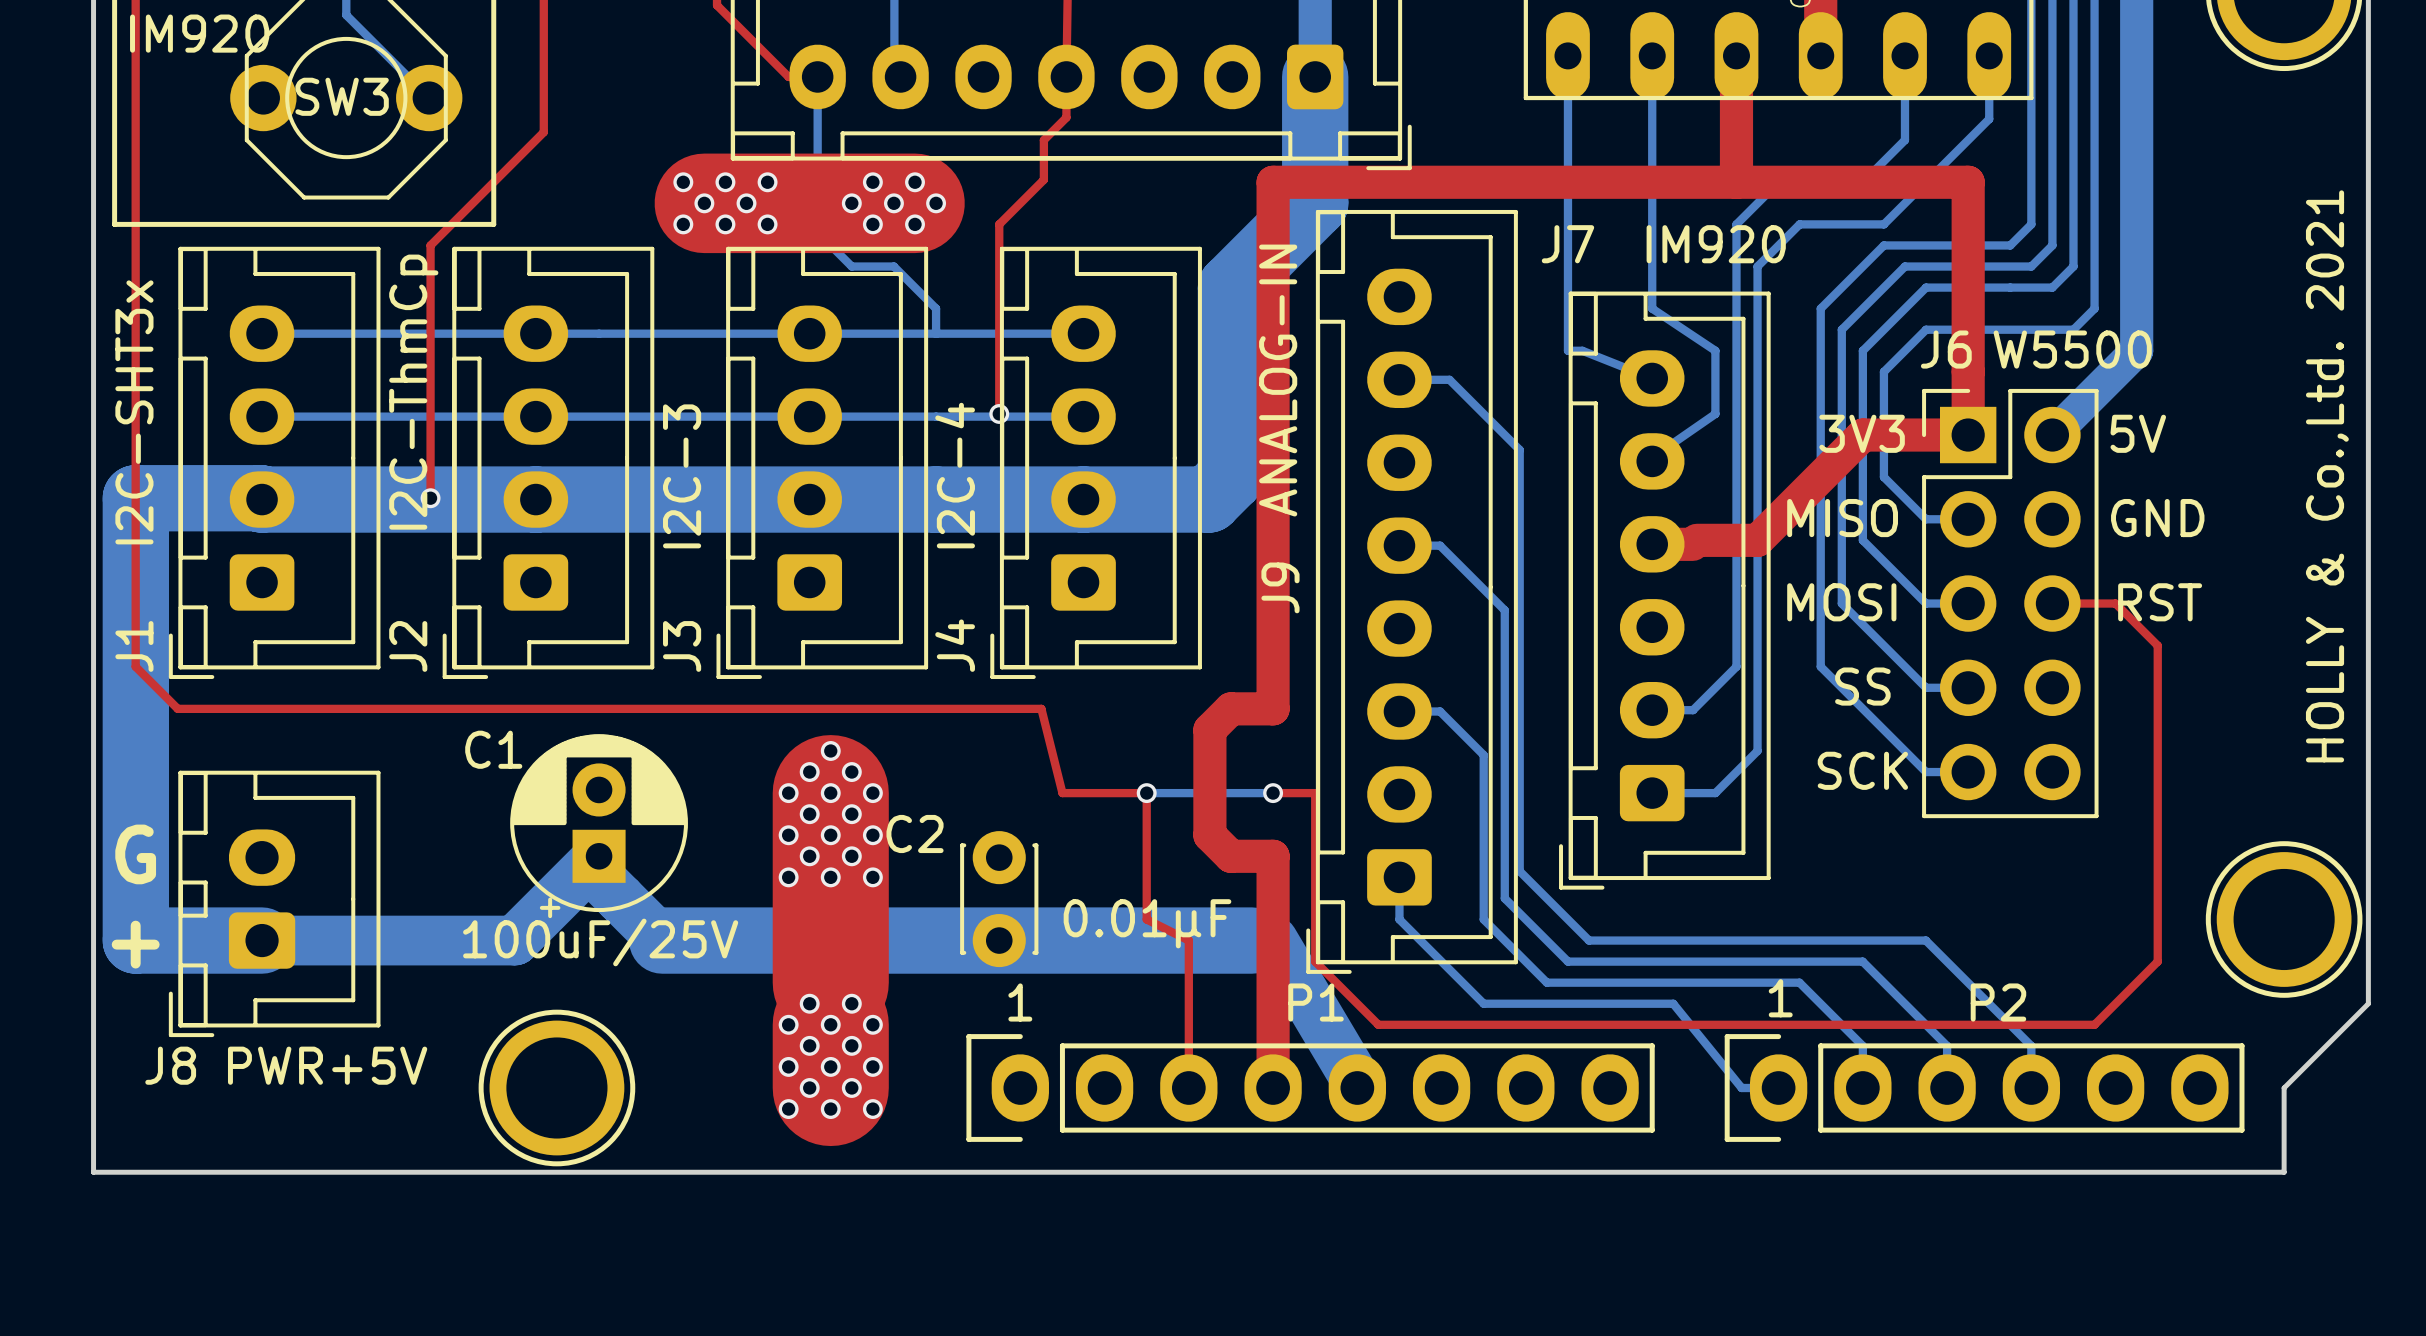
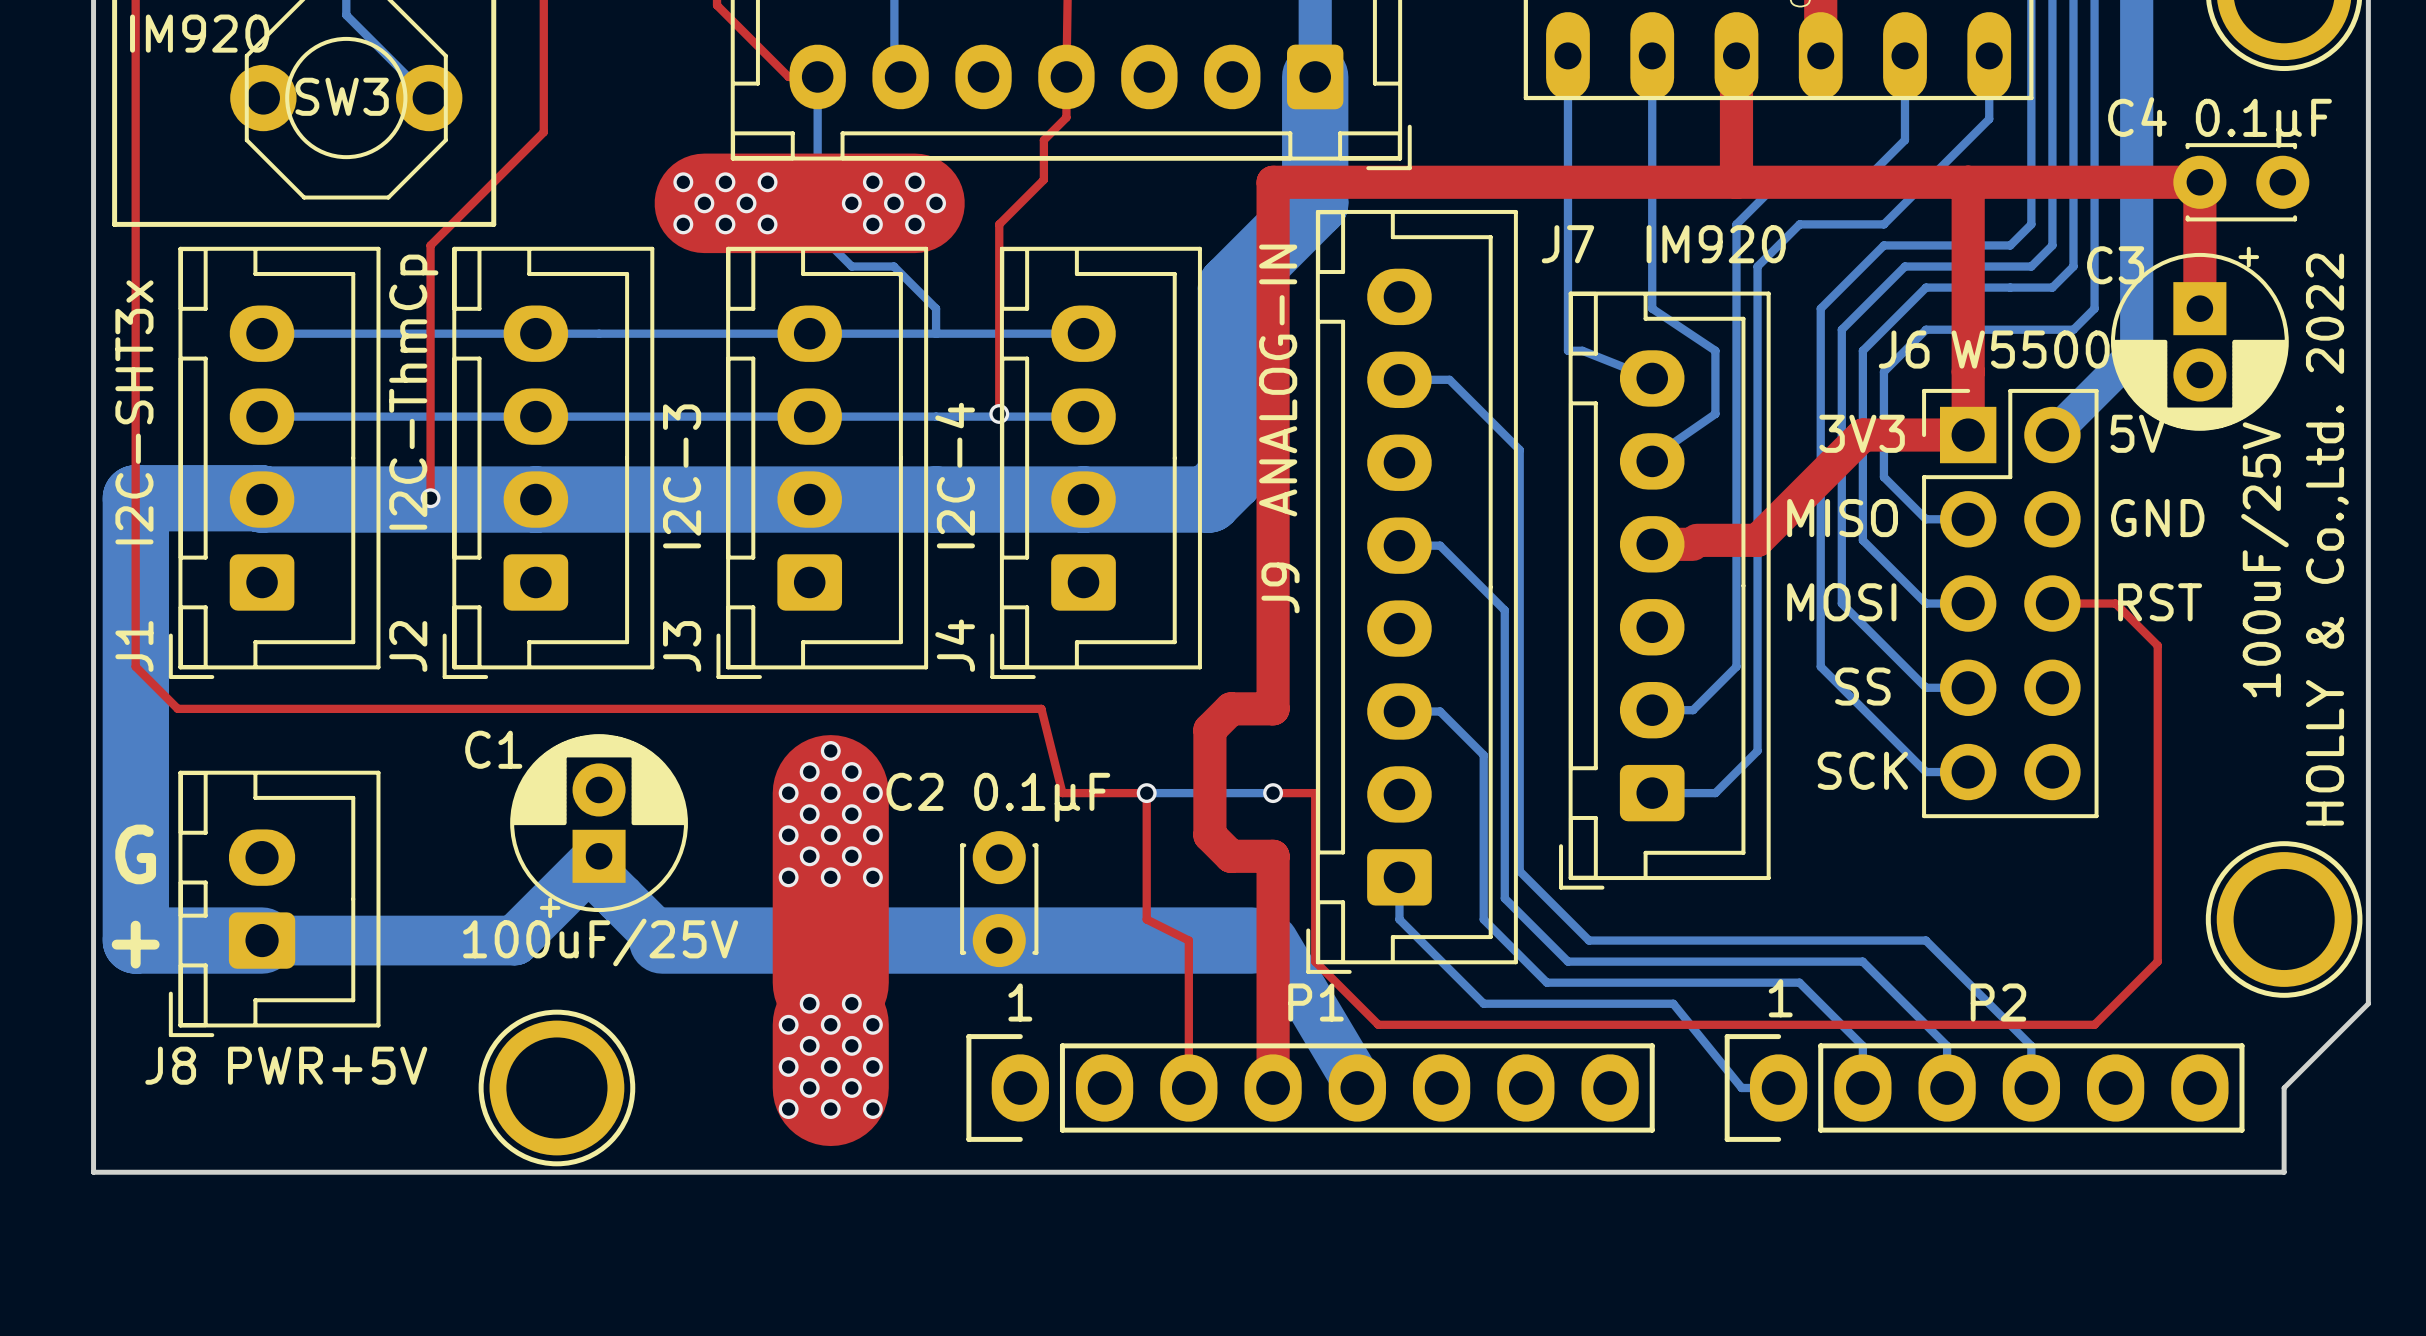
top track: none -> (1968, 182) (2199, 182) (2199, 308)
C4: none -> 0.1μF (2241, 182)
C3: none -> 100uF/25V (2199, 338)
J6 name position: J6 (1946, 349) -> J6 (1904, 349)
J6 value position: W5500 (2072, 349) -> W5500 (2030, 349)
text: HOLLY & Co.,Ltd. 2021 (2327, 476) -> HOLLY & Co.,Ltd. 2022 (2327, 539)
C2 name position: C2 (915, 833) -> C2 (915, 791)
C2 value: 0.01μF (1147, 923) -> 0.1μF (1042, 797)

